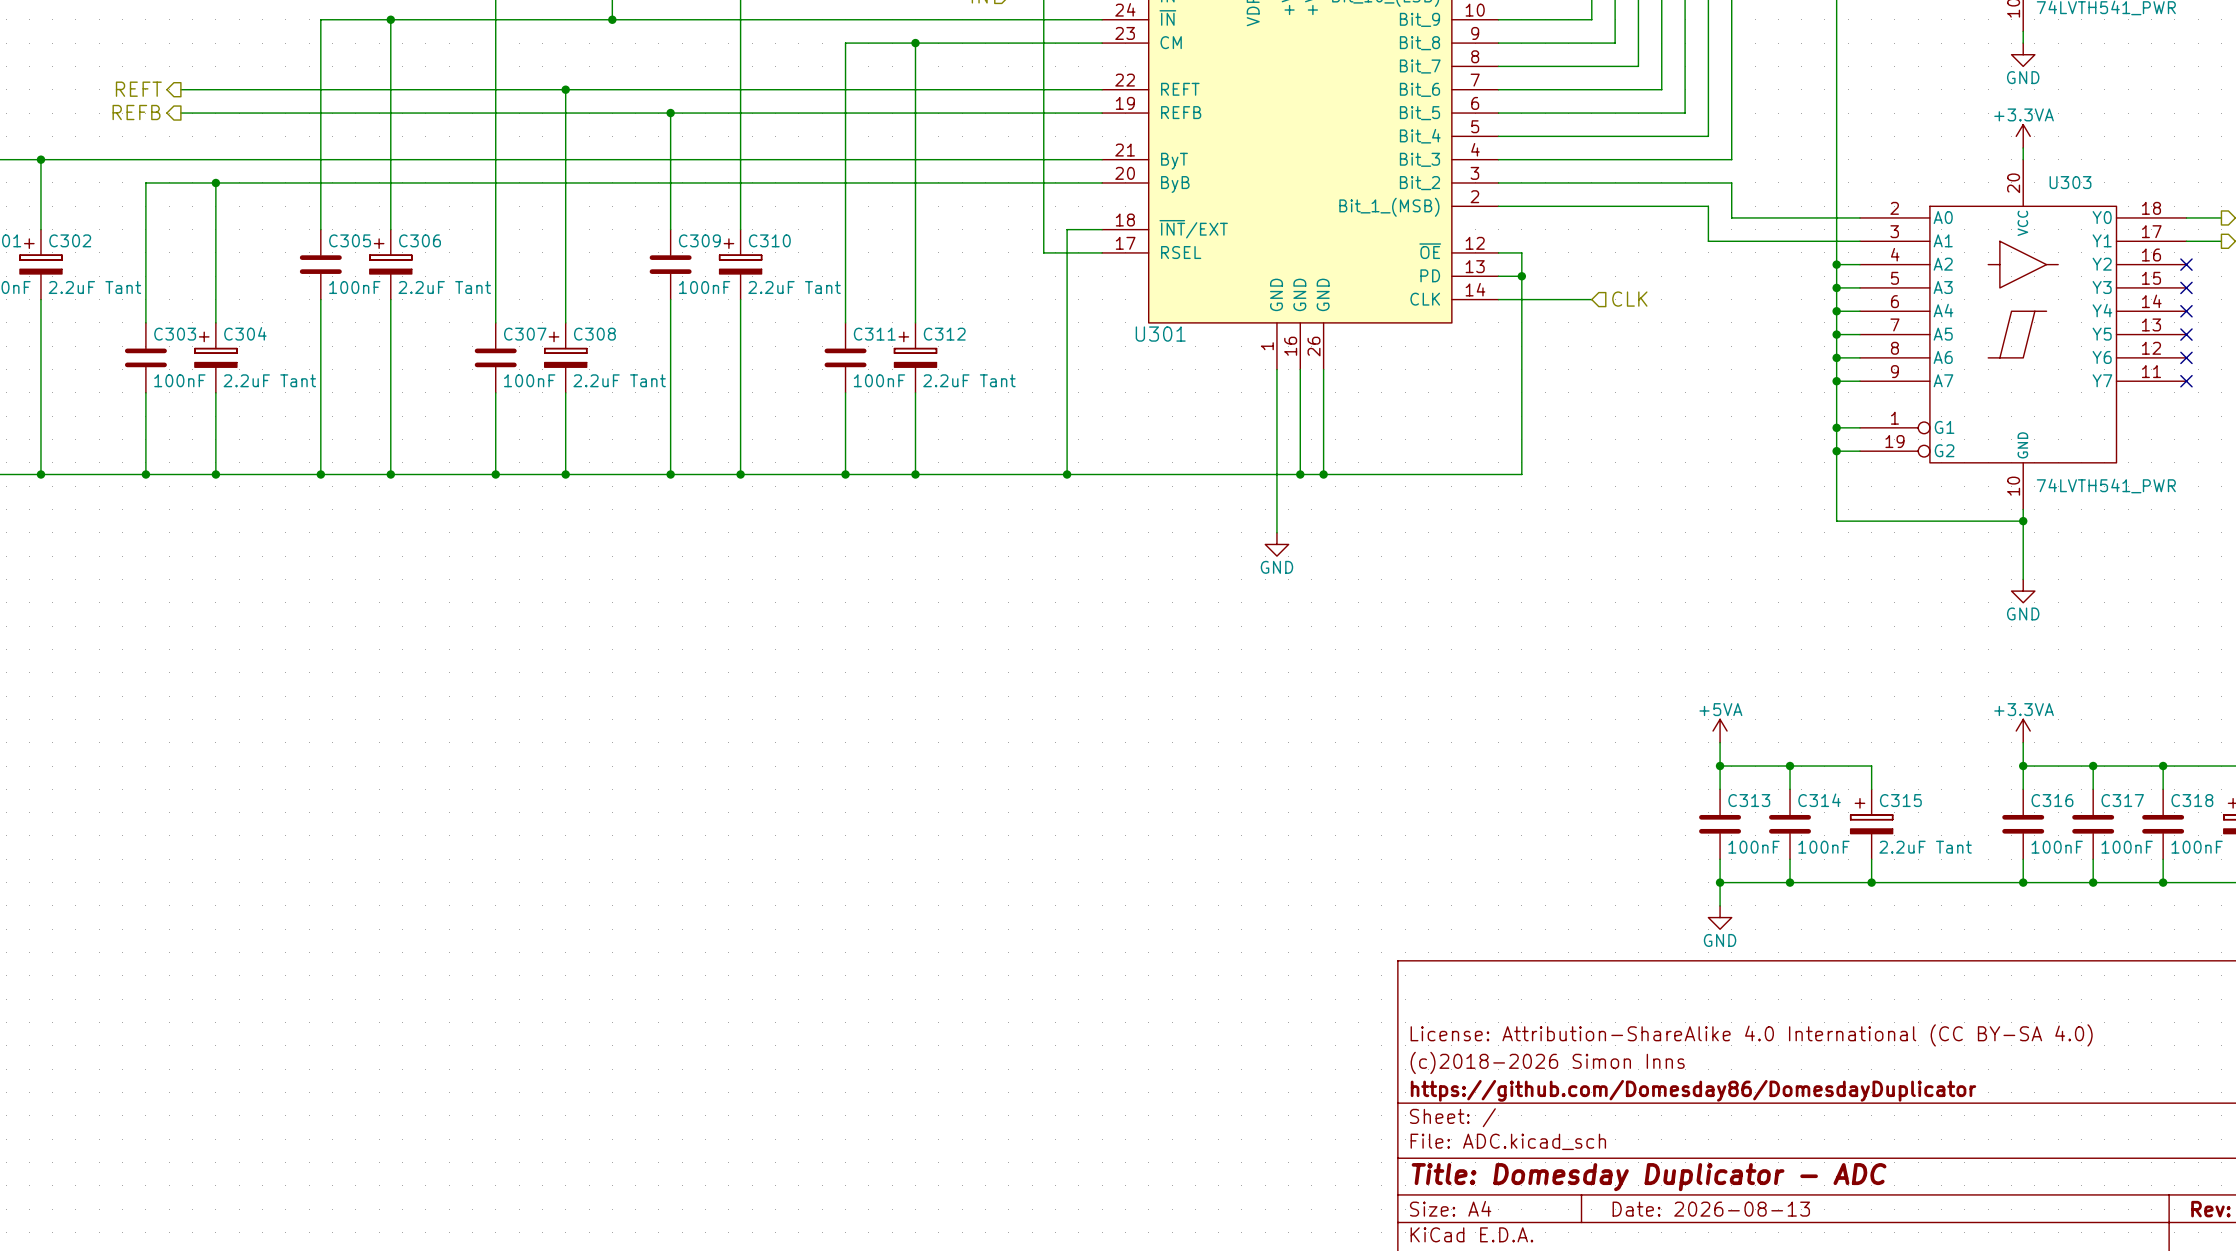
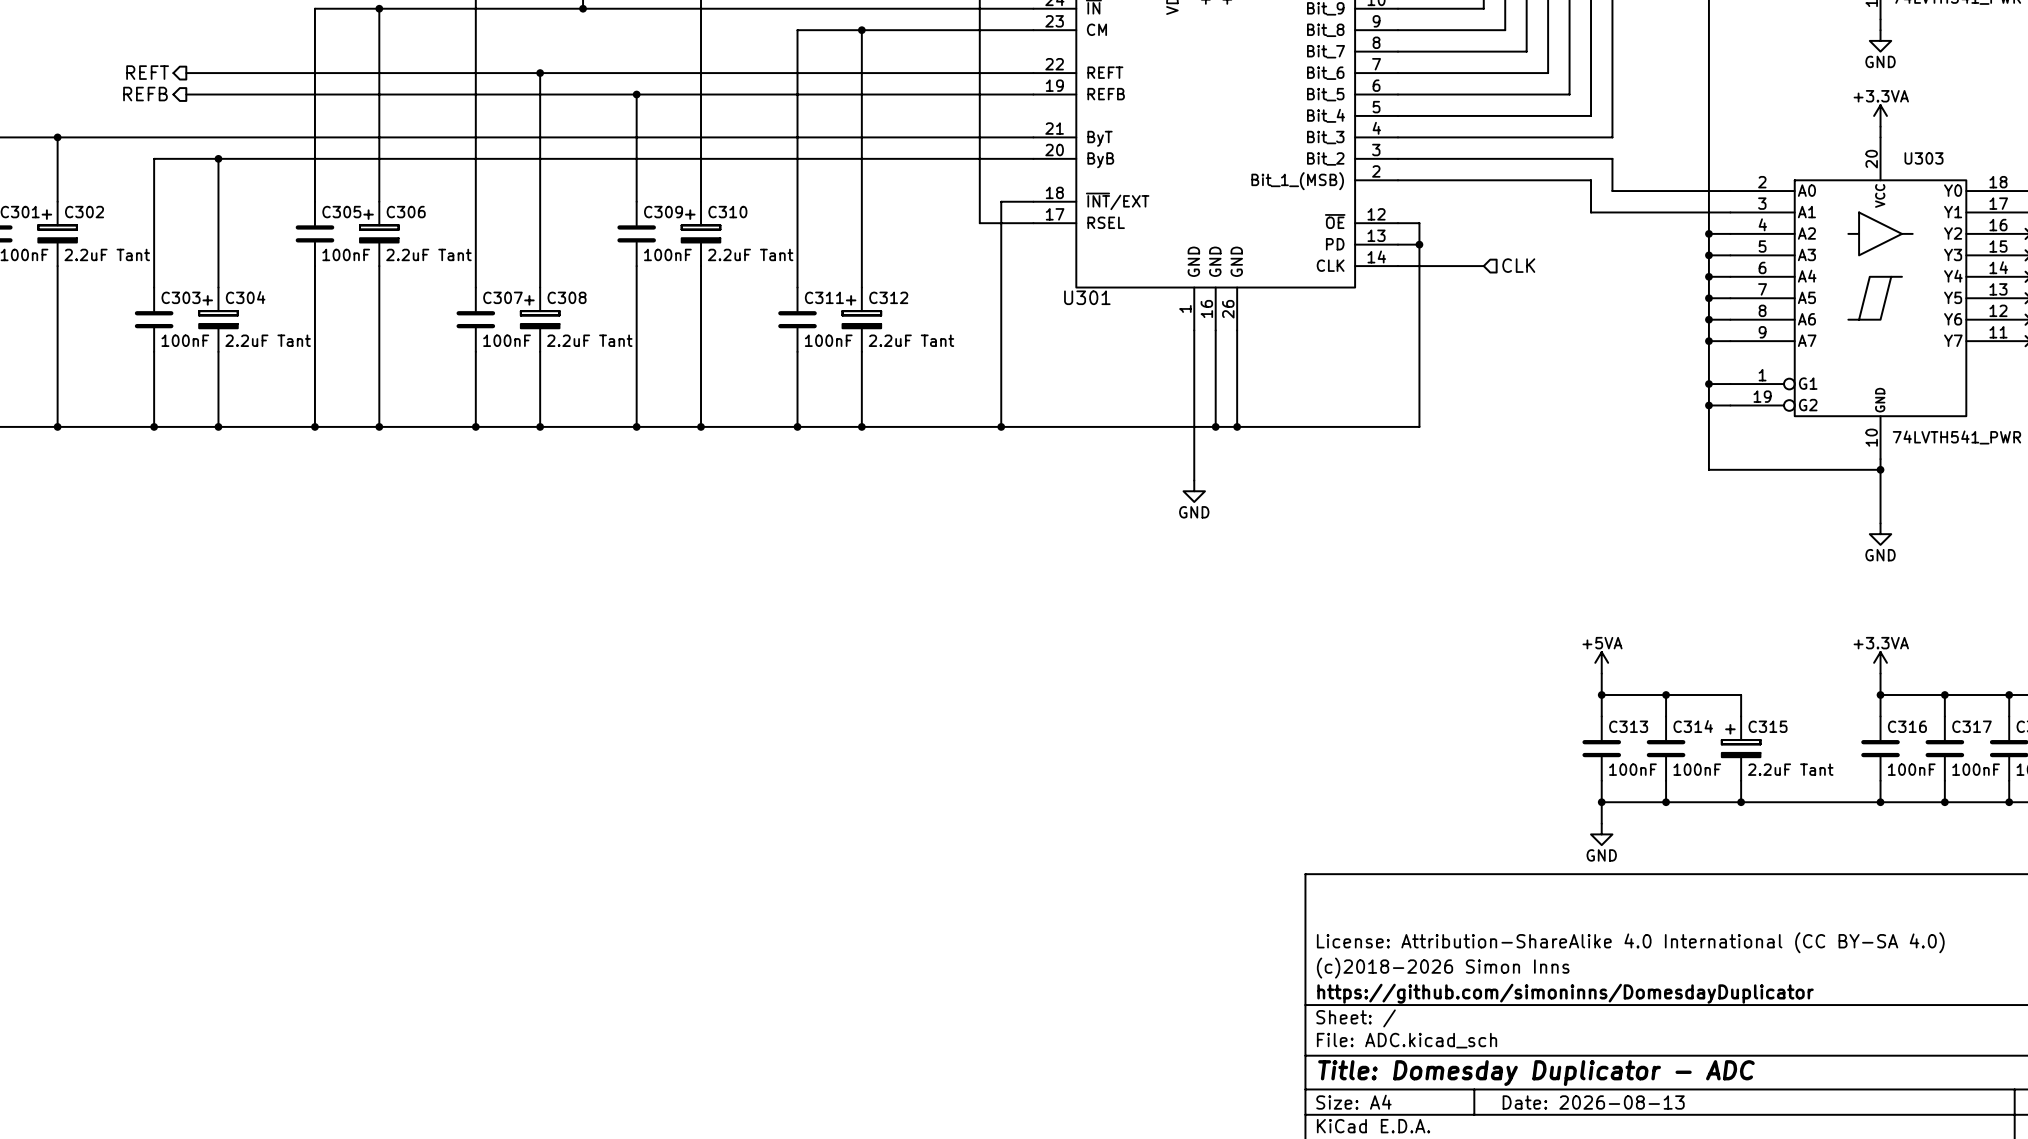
title block: https://github.com/Domesday86/DomesdayDuplicator (1693, 1090) -> https://github.com/simoninns/DomesdayDuplicator (1565, 993)

